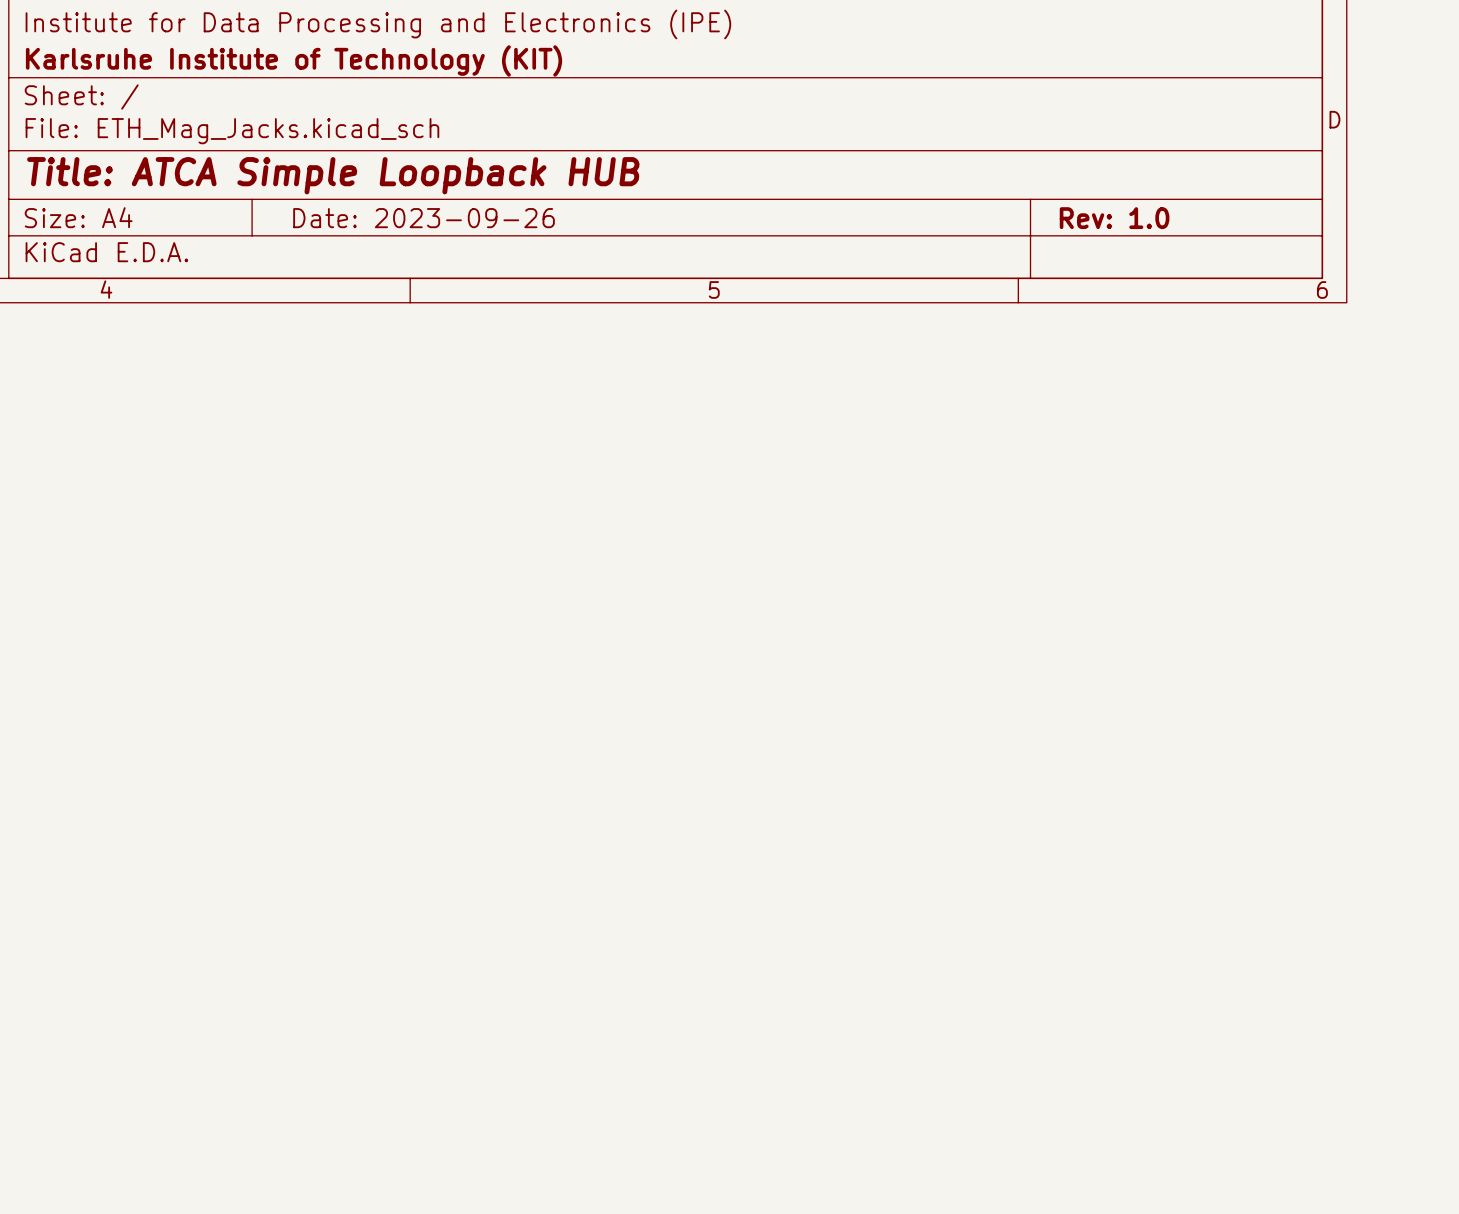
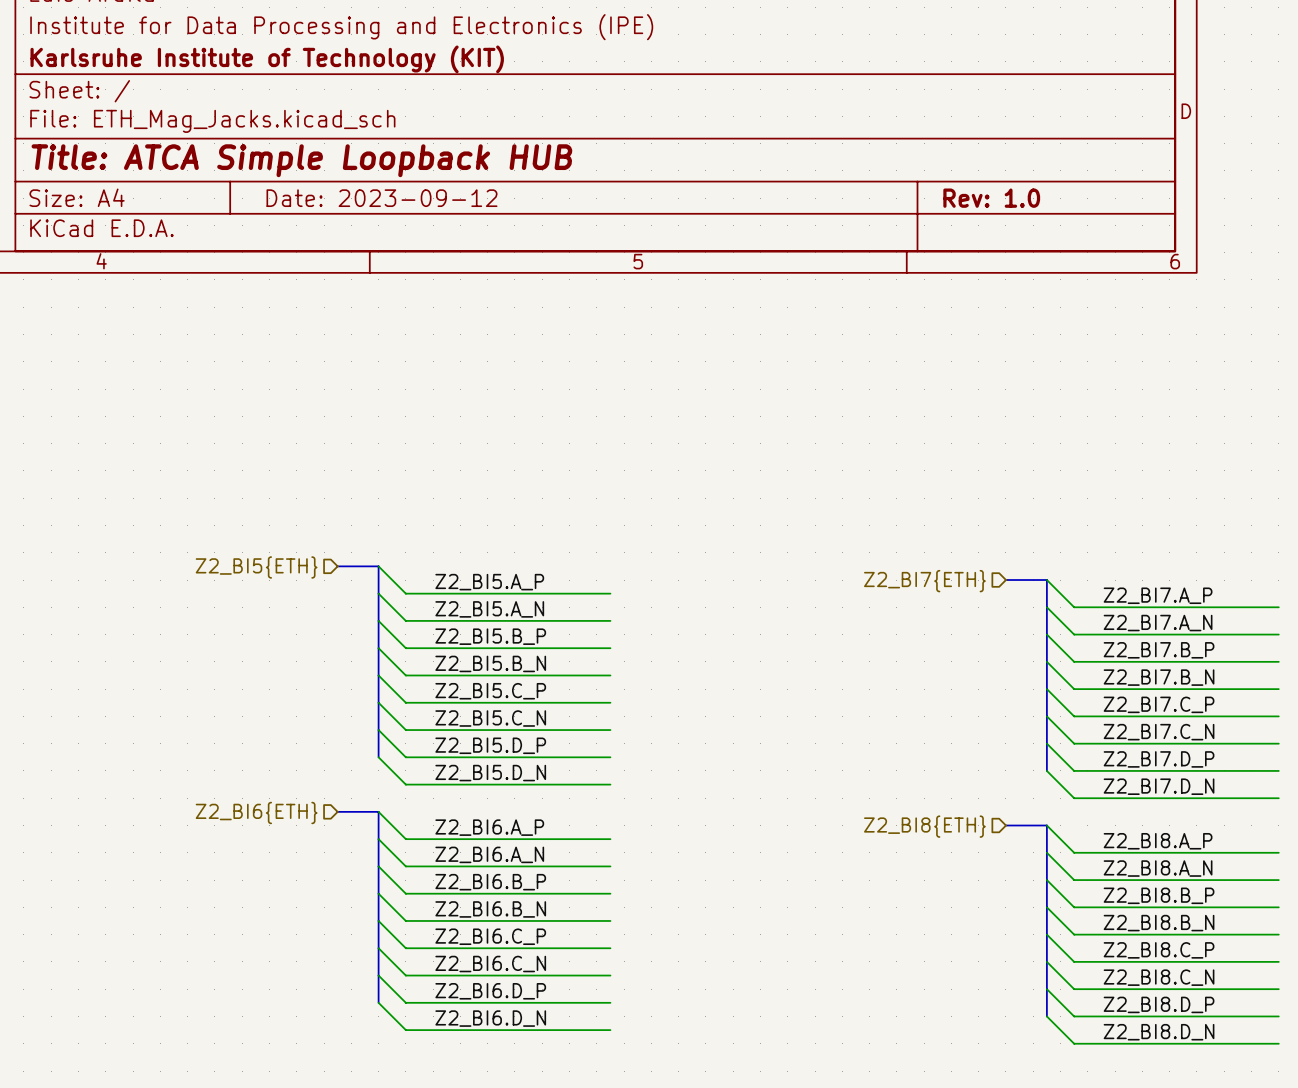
title block: Date: 2023-09-26 (424, 218) -> Date: 2023-09-12 (381, 198)
bus: none -> (337, 566) (378, 566) (378, 757)
wire: none -> (378, 566) (405, 593) (610, 593)
hierarchical label: none -> Z2_BI5{ETH} (256, 567)
bus: none -> (1005, 580) (1046, 580) (1046, 770)
wire: none -> (1046, 580) (1074, 607) (1278, 607)
hierarchical label: none -> Z2_BI7{ETH} (924, 581)
label: none -> Z2_BI5.A_P (489, 582)
wire: none -> (378, 593) (405, 620) (610, 620)
label: none -> Z2_BI7.A_P (1158, 595)
wire: none -> (1046, 607) (1074, 634) (1278, 634)
label: none -> Z2_BI5.A_N (489, 609)
wire: none -> (378, 620) (405, 648) (610, 648)
label: none -> Z2_BI7.A_N (1158, 623)
wire: none -> (1046, 634) (1074, 661) (1278, 661)
label: none -> Z2_BI5.B_P (490, 636)
wire: none -> (378, 648) (405, 675) (610, 675)
label: none -> Z2_BI7.B_P (1159, 650)
wire: none -> (1046, 661) (1074, 689) (1278, 689)
label: none -> Z2_BI5.B_N (490, 663)
wire: none -> (378, 675) (405, 702) (610, 702)
label: none -> Z2_BI7.B_N (1159, 677)
wire: none -> (1046, 689) (1074, 716) (1278, 716)
label: none -> Z2_BI5.C_P (490, 691)
wire: none -> (378, 702) (405, 730) (610, 730)
label: none -> Z2_BI7.C_P (1159, 704)
wire: none -> (1046, 716) (1074, 743) (1278, 743)
label: none -> Z2_BI5.C_N (490, 718)
wire: none -> (378, 730) (405, 757) (610, 757)
label: none -> Z2_BI7.C_N (1159, 732)
wire: none -> (1046, 743) (1074, 770) (1278, 770)
label: none -> Z2_BI5.D_P (490, 745)
wire: none -> (378, 757) (405, 784) (610, 784)
label: none -> Z2_BI7.D_P (1159, 759)
wire: none -> (1046, 770) (1074, 798) (1278, 798)
label: none -> Z2_BI5.D_N (490, 773)
label: none -> Z2_BI7.D_N (1159, 786)
bus: none -> (337, 811) (378, 811) (378, 1002)
wire: none -> (378, 811) (405, 839) (610, 839)
hierarchical label: none -> Z2_BI6{ETH} (256, 812)
bus: none -> (1005, 825) (1046, 825) (1046, 1016)
wire: none -> (1046, 825) (1074, 852) (1278, 852)
hierarchical label: none -> Z2_BI8{ETH} (924, 826)
label: none -> Z2_BI6.A_P (489, 827)
wire: none -> (378, 839) (405, 866) (610, 866)
label: none -> Z2_BI8.A_P (1158, 841)
wire: none -> (1046, 852) (1074, 880) (1278, 880)
label: none -> Z2_BI6.A_N (489, 854)
wire: none -> (378, 866) (405, 893) (610, 893)
label: none -> Z2_BI8.A_N (1158, 868)
wire: none -> (1046, 880) (1074, 907) (1278, 907)
label: none -> Z2_BI6.B_P (490, 882)
wire: none -> (378, 893) (405, 920) (610, 920)
label: none -> Z2_BI8.B_P (1159, 895)
wire: none -> (1046, 907) (1074, 934) (1278, 934)
label: none -> Z2_BI6.B_N (490, 909)
wire: none -> (378, 920) (405, 948) (610, 948)
label: none -> Z2_BI8.B_N (1159, 923)
wire: none -> (1046, 934) (1074, 961) (1278, 961)
label: none -> Z2_BI6.C_P (490, 936)
wire: none -> (378, 948) (405, 975) (610, 975)
label: none -> Z2_BI8.C_P (1159, 950)
wire: none -> (1046, 961) (1074, 989) (1278, 989)
label: none -> Z2_BI6.C_N (490, 964)
wire: none -> (378, 975) (405, 1002) (610, 1002)
label: none -> Z2_BI8.C_N (1159, 977)
wire: none -> (1046, 989) (1074, 1016) (1278, 1016)
label: none -> Z2_BI6.D_P (490, 991)
wire: none -> (378, 1002) (405, 1030) (610, 1030)
label: none -> Z2_BI8.D_P (1159, 1004)
wire: none -> (1046, 1016) (1074, 1043) (1278, 1043)
label: none -> Z2_BI6.D_N (490, 1018)
label: none -> Z2_BI8.D_N (1159, 1032)

